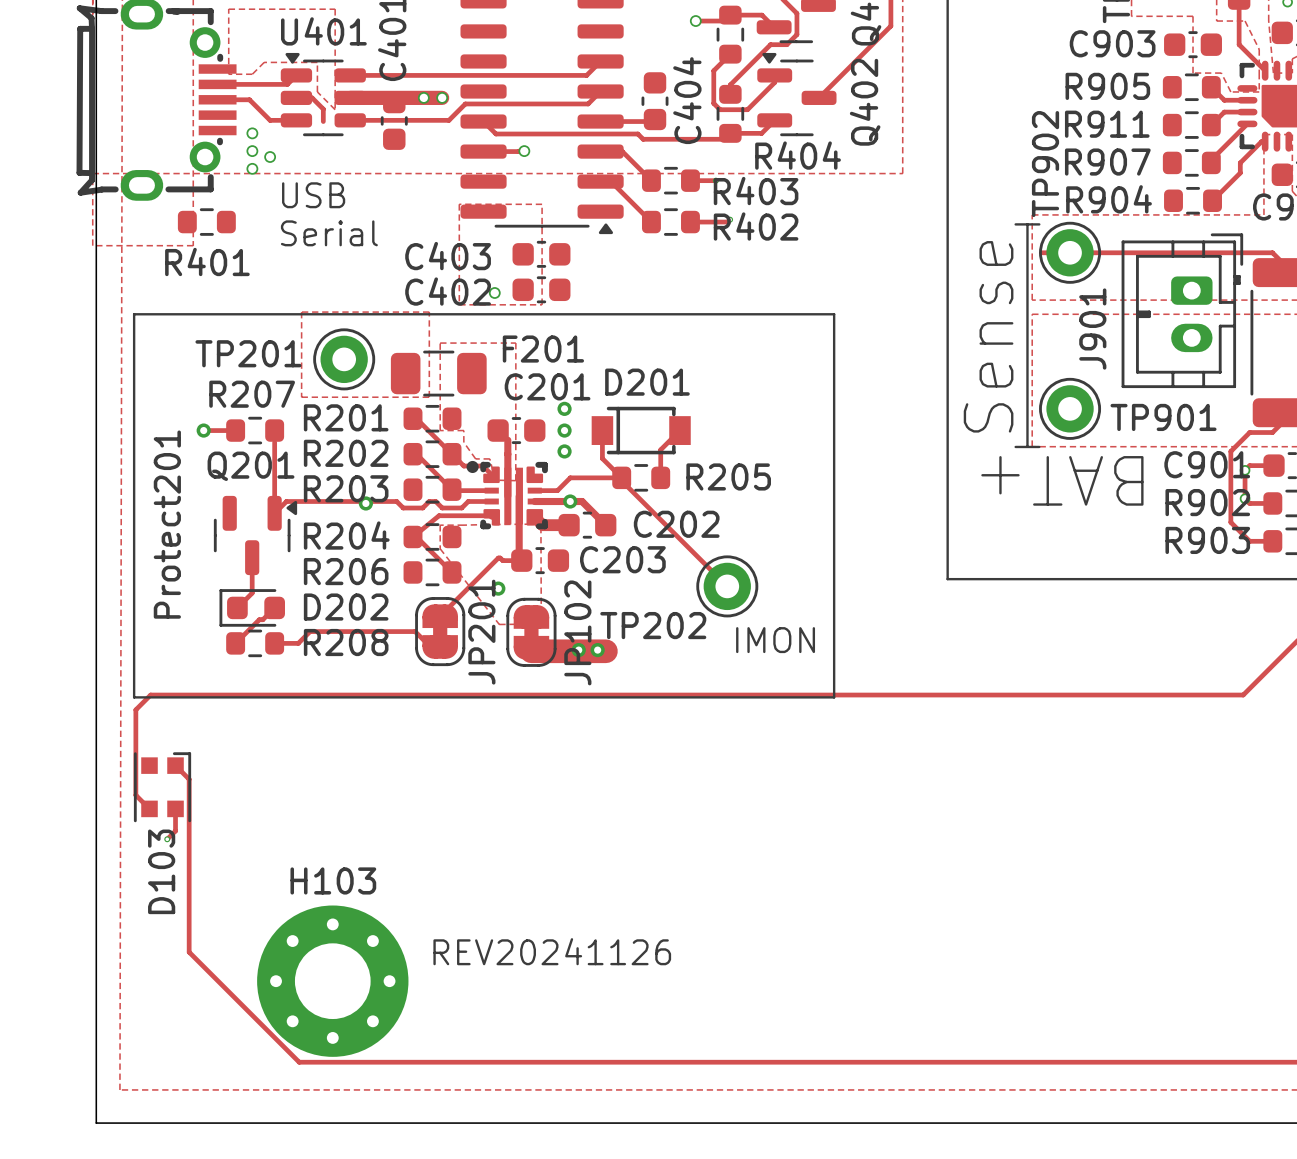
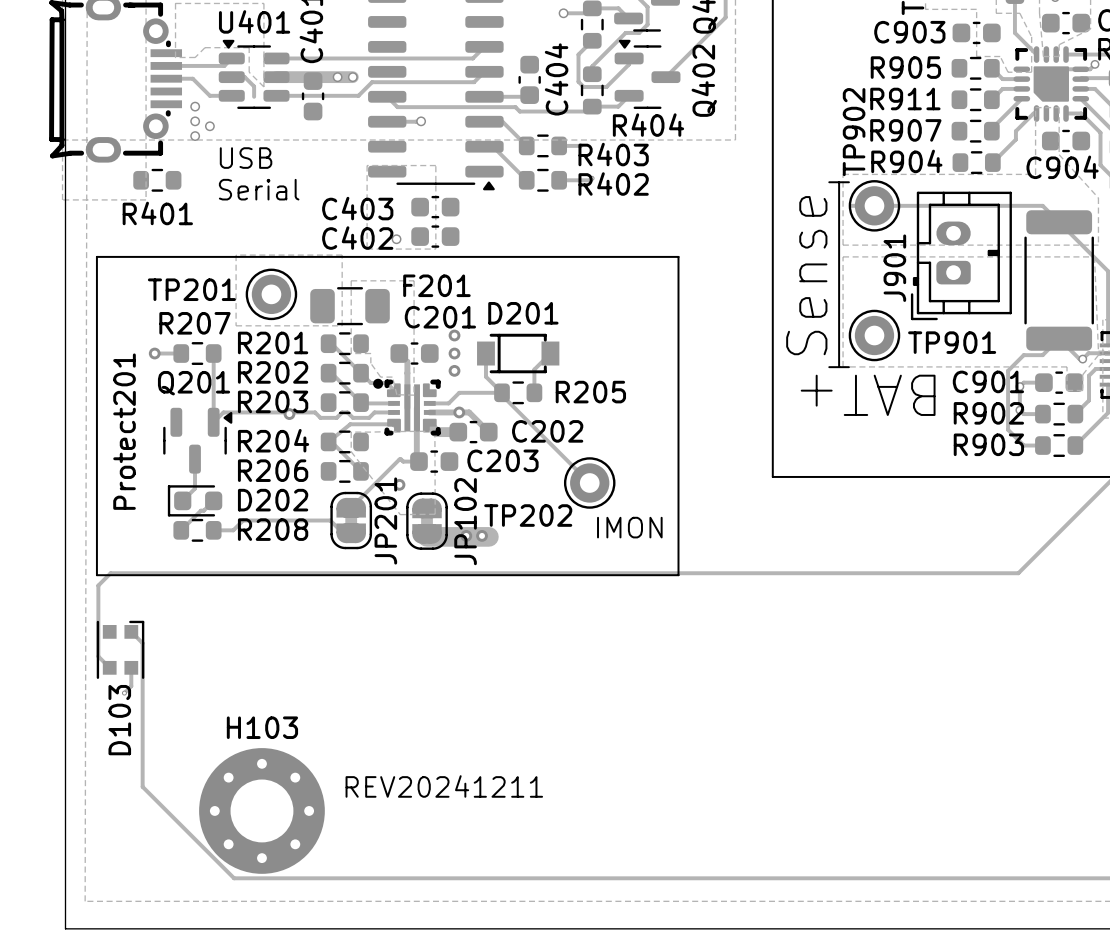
J901 rotation: 0° (1182, 310) -> 180° (961, 255)
text: REV20241126 (552, 951) -> REV20241211 (444, 786)

